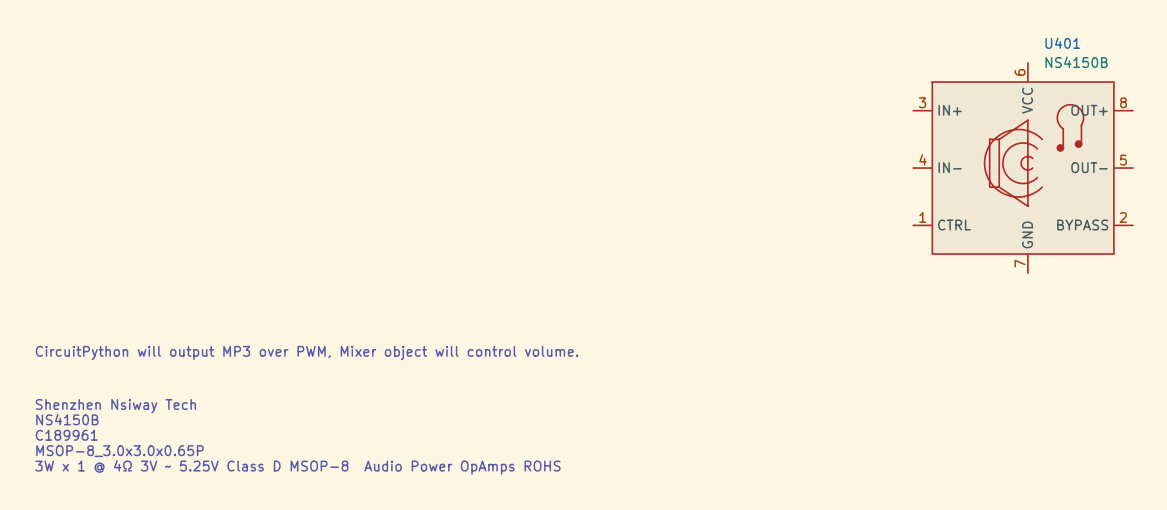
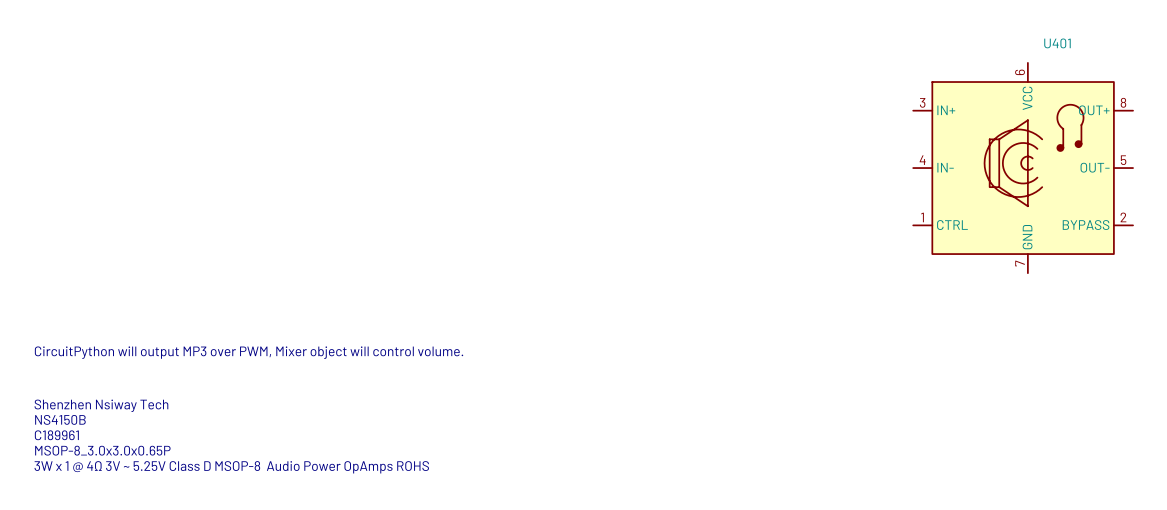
U401 value: NS4150B (1076, 62) -> none

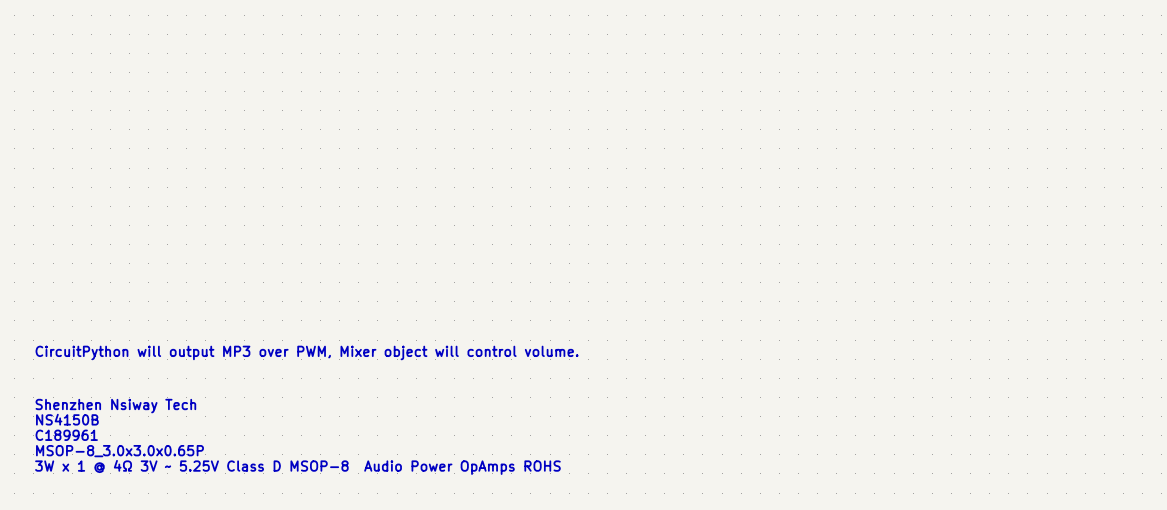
U401: (1023, 168) -> none

